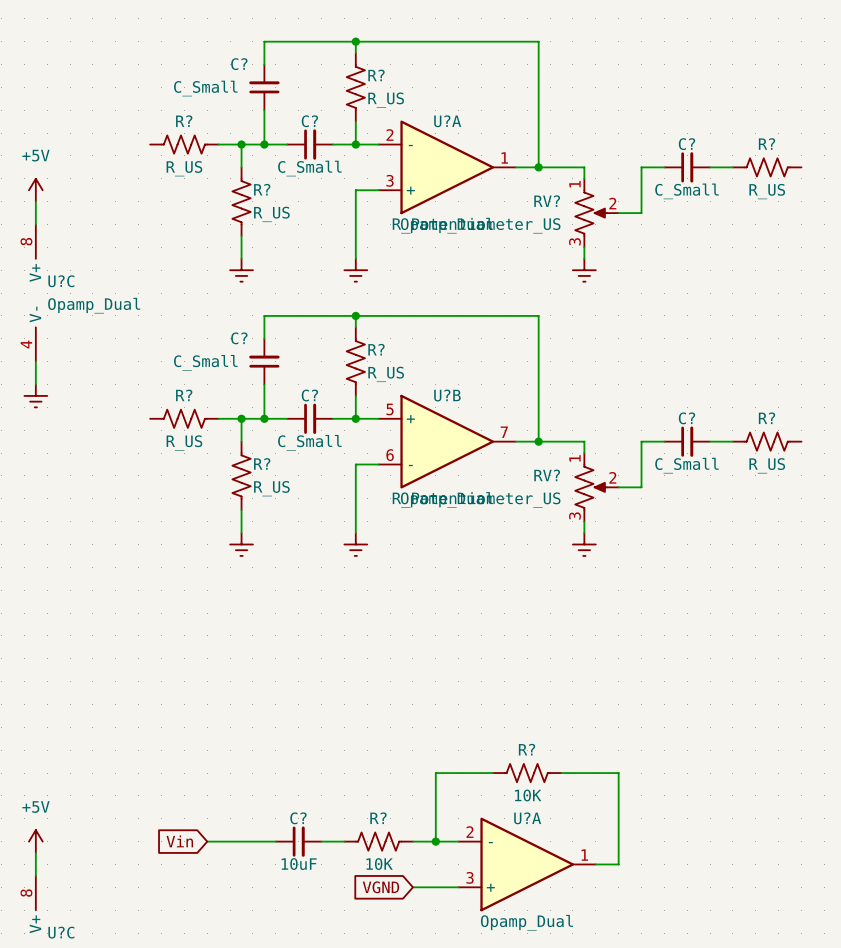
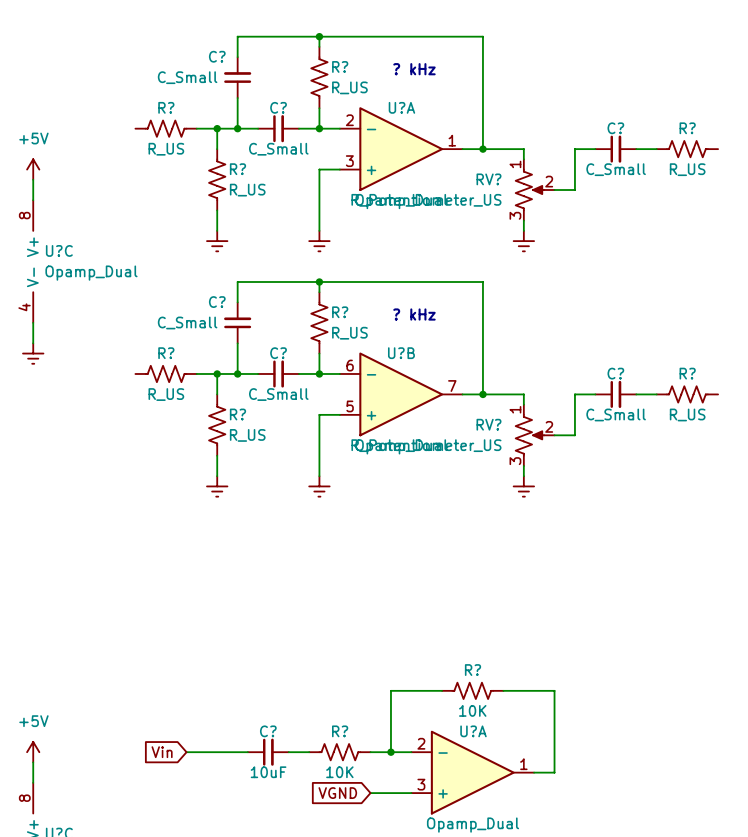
text: none -> ? kHz (414, 69)
text: none -> ? kHz (414, 314)
U?B flip: as is (447, 441) -> up-down (401, 394)

